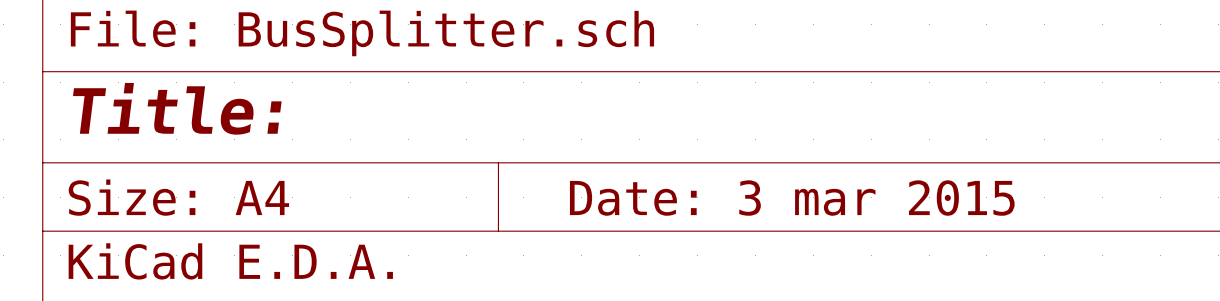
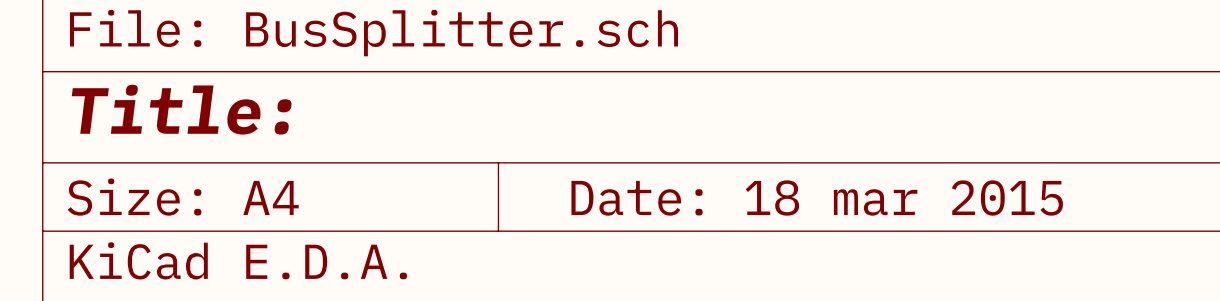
title block: Date: 3 mar 2015 (792, 198) -> Date: 18 mar 2015 (817, 198)

